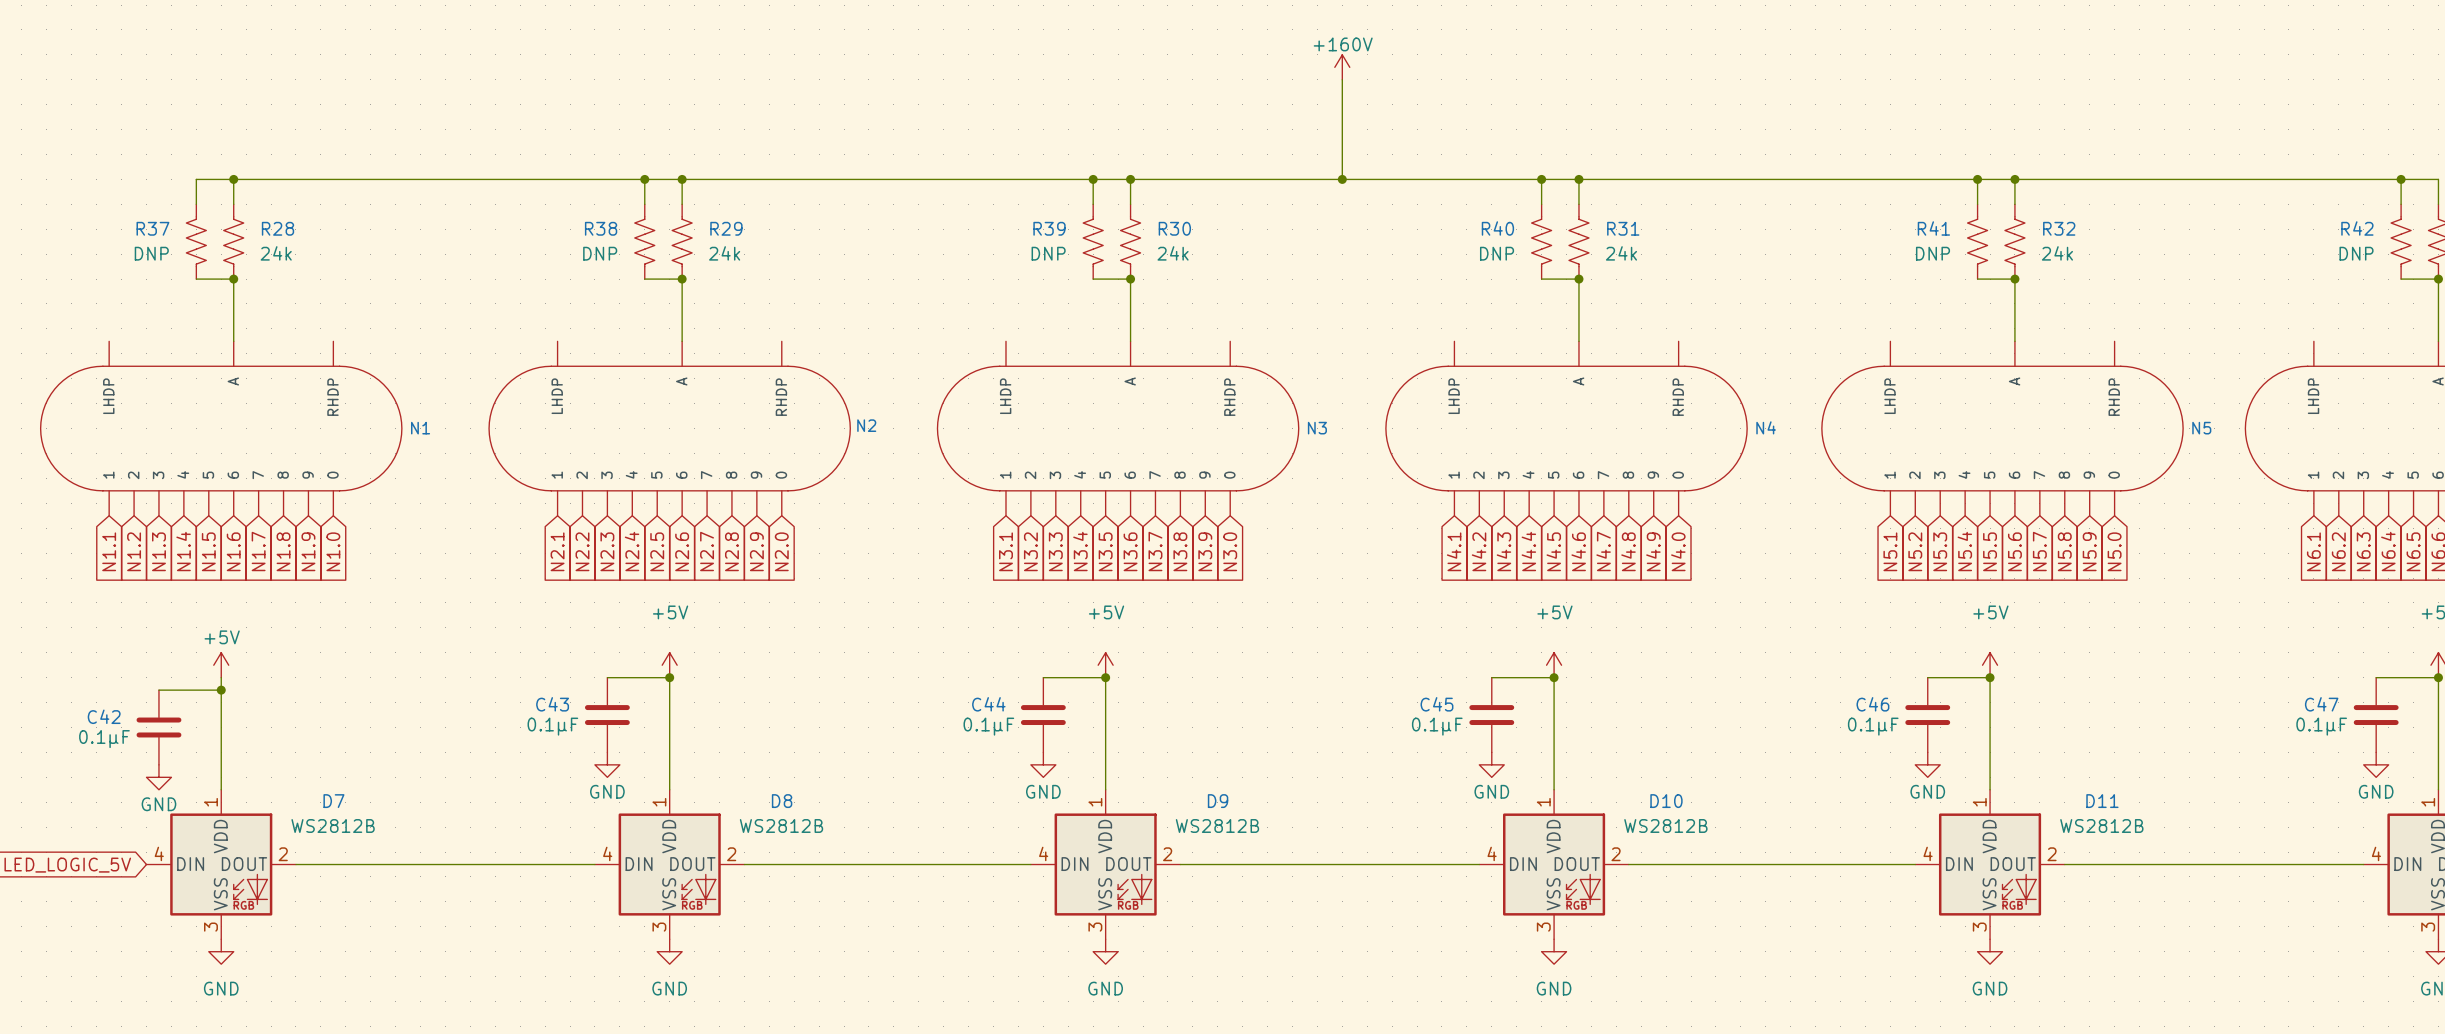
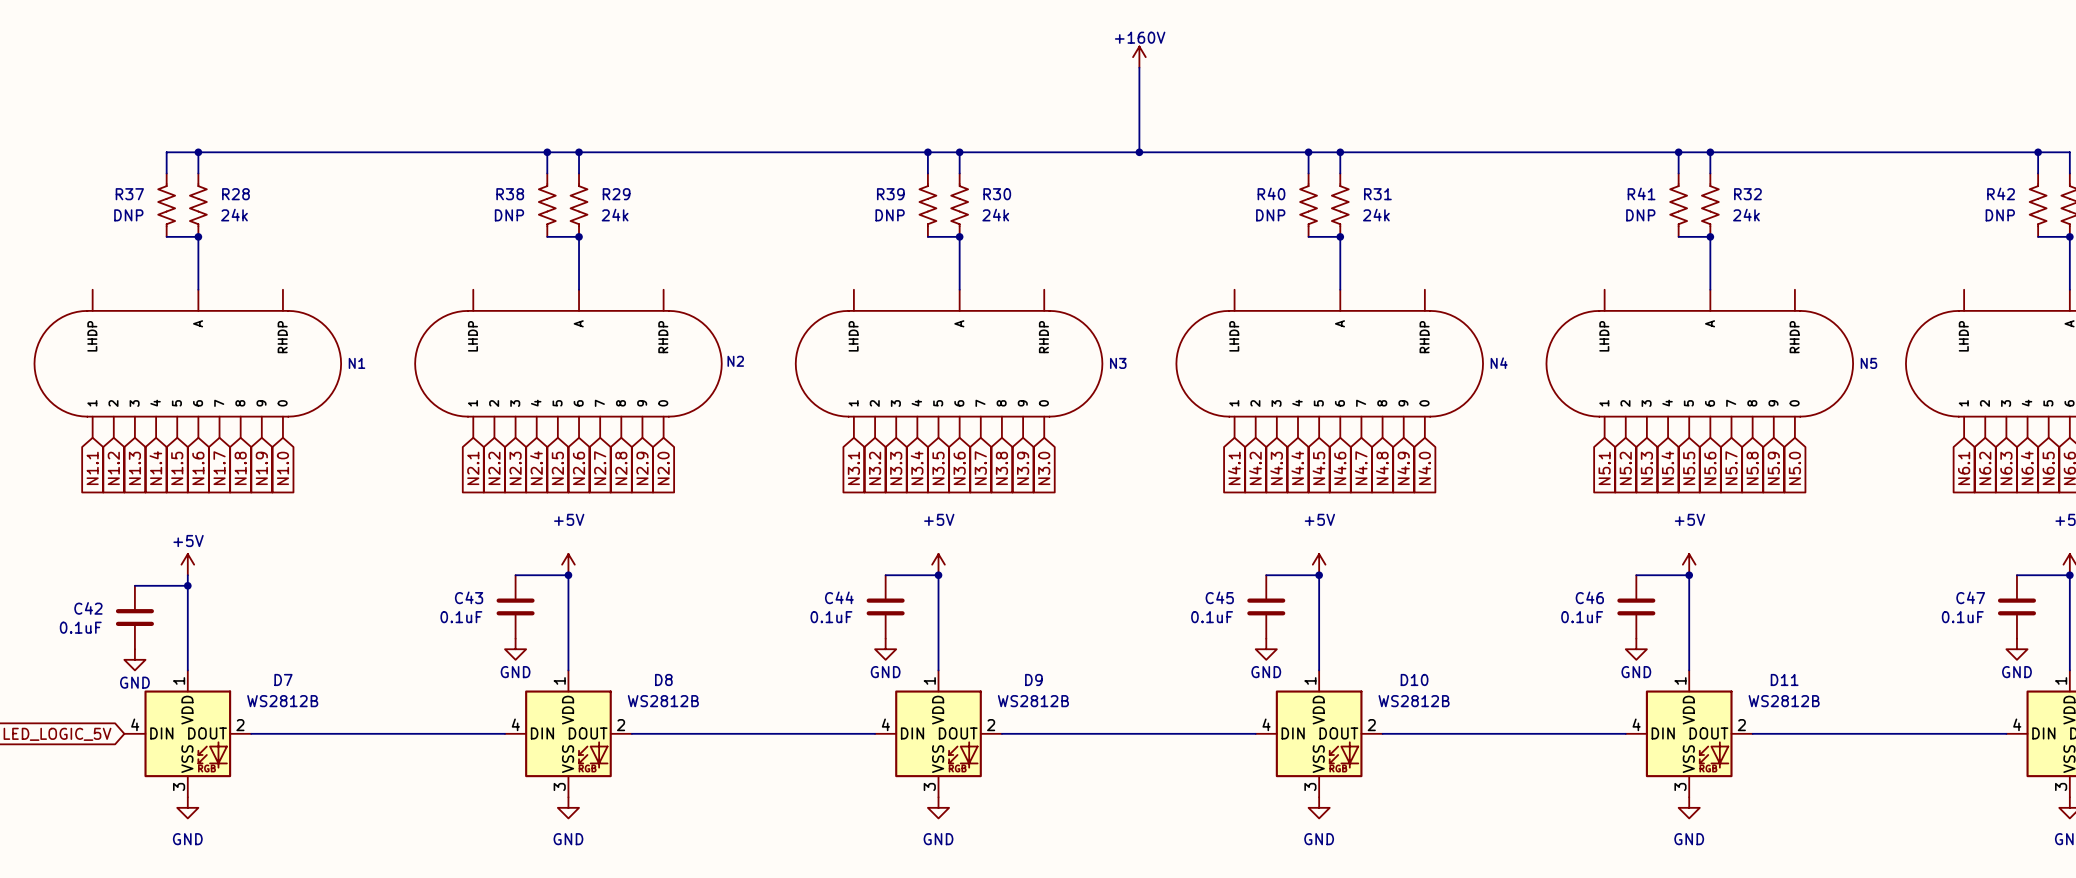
C43 value: 0.1µF (552, 726) -> 0.1uF (461, 617)
C44 value: 0.1µF (988, 726) -> 0.1uF (831, 617)
C45 value: 0.1µF (1437, 726) -> 0.1uF (1212, 617)
C46 value: 0.1µF (1873, 726) -> 0.1uF (1582, 617)
C47 value: 0.1µF (2321, 726) -> 0.1uF (1962, 617)
C42 value: 0.1µF (104, 739) -> 0.1uF (80, 627)

